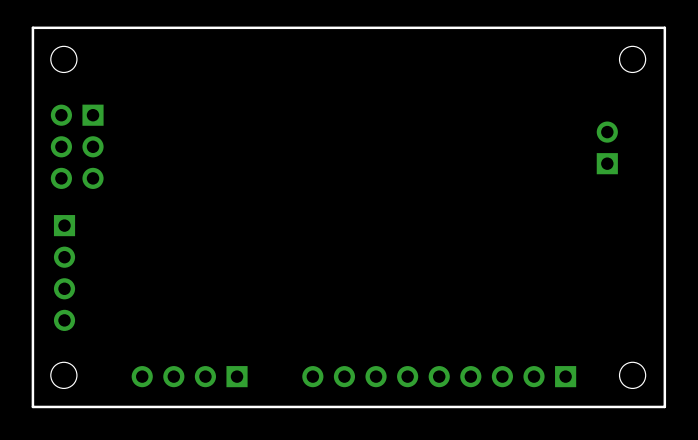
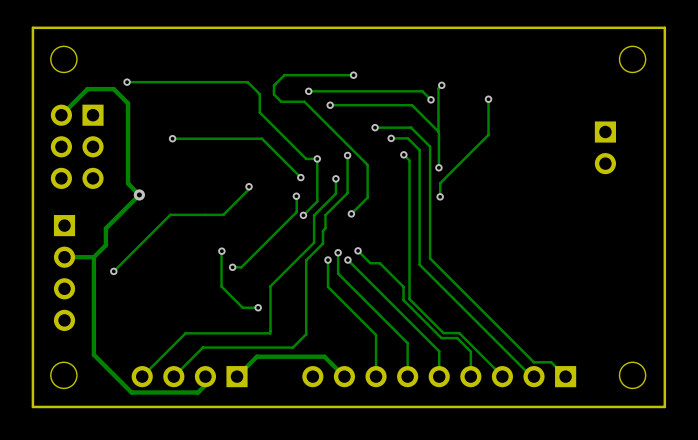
track: none -> (353, 75) (284, 75) (273, 85) (273, 94) (281, 101) (304, 101) (367, 164) (367, 197) (351, 213)
via: none -> (353, 75)
track: none -> (127, 82) (247, 82) (259, 94) (259, 112) (306, 158) (317, 158) (317, 201) (303, 215)
via: none -> (127, 82)
track: none -> (441, 85) (438, 88) (438, 131)
via: none -> (441, 85)
track: none -> (308, 91) (422, 91) (431, 99)
via: none -> (308, 91)
via: none -> (431, 99)
track: none -> (488, 99) (488, 134) (440, 183) (440, 196)
via: none -> (488, 99)
track: none -> (330, 105) (412, 105) (438, 132) (438, 167)
via: none -> (330, 105)
track: none -> (61, 115) (87, 89) (113, 89) (128, 103) (128, 183) (139, 194) (105, 228) (105, 245) (93, 257)
track: none -> (375, 127) (411, 127) (430, 146) (430, 258) (533, 362) (551, 362) (565, 376)
via: none -> (375, 127)
track: none -> (172, 138) (261, 138) (300, 177)
via: none -> (172, 138)
track: none -> (391, 138) (407, 138) (419, 150) (419, 264) (531, 376) (534, 376)
via: none -> (391, 138)
part rotation: 0° (607, 147) -> 180° (605, 147)
track: none -> (403, 154) (409, 160) (409, 299) (443, 333) (459, 333) (502, 376)
via: none -> (403, 154)
track: none -> (347, 155) (347, 193) (325, 215) (322, 243) (306, 260) (306, 334) (292, 347) (202, 347) (173, 376)
via: none -> (347, 155)
via: none -> (317, 158)
via: none -> (438, 167)
via: none -> (300, 177)
track: none -> (335, 178) (335, 193) (314, 215) (314, 242) (270, 286) (270, 333) (185, 333) (142, 376)
via: none -> (335, 178)
track: none -> (249, 186) (248, 189) (223, 214) (170, 214) (113, 271)
via: none -> (249, 186)
via: none -> (139, 194)
track: none -> (296, 196) (296, 212) (241, 267) (232, 267)
via: none -> (296, 196)
via: none -> (440, 196)
via: none -> (351, 213)
via: none -> (303, 215)
track: none -> (358, 250) (370, 263) (379, 263) (403, 286) (403, 300) (441, 338) (457, 338) (470, 351) (470, 376)
via: none -> (358, 250)
track: none -> (221, 251) (221, 286) (242, 307) (258, 307)
via: none -> (221, 251)
track: none -> (338, 252) (338, 273) (407, 343) (407, 376)
via: none -> (338, 252)
track: none -> (93, 257) (93, 354) (131, 392) (198, 392) (205, 385) (205, 376)
track: none -> (93, 257) (64, 257)
track: none -> (328, 260) (328, 286) (376, 334) (376, 376)
via: none -> (328, 260)
track: none -> (347, 260) (439, 351) (439, 376)
via: none -> (347, 260)
via: none -> (232, 267)
via: none -> (113, 271)
via: none -> (258, 307)
track: none -> (344, 376) (324, 356) (256, 356) (237, 376)

